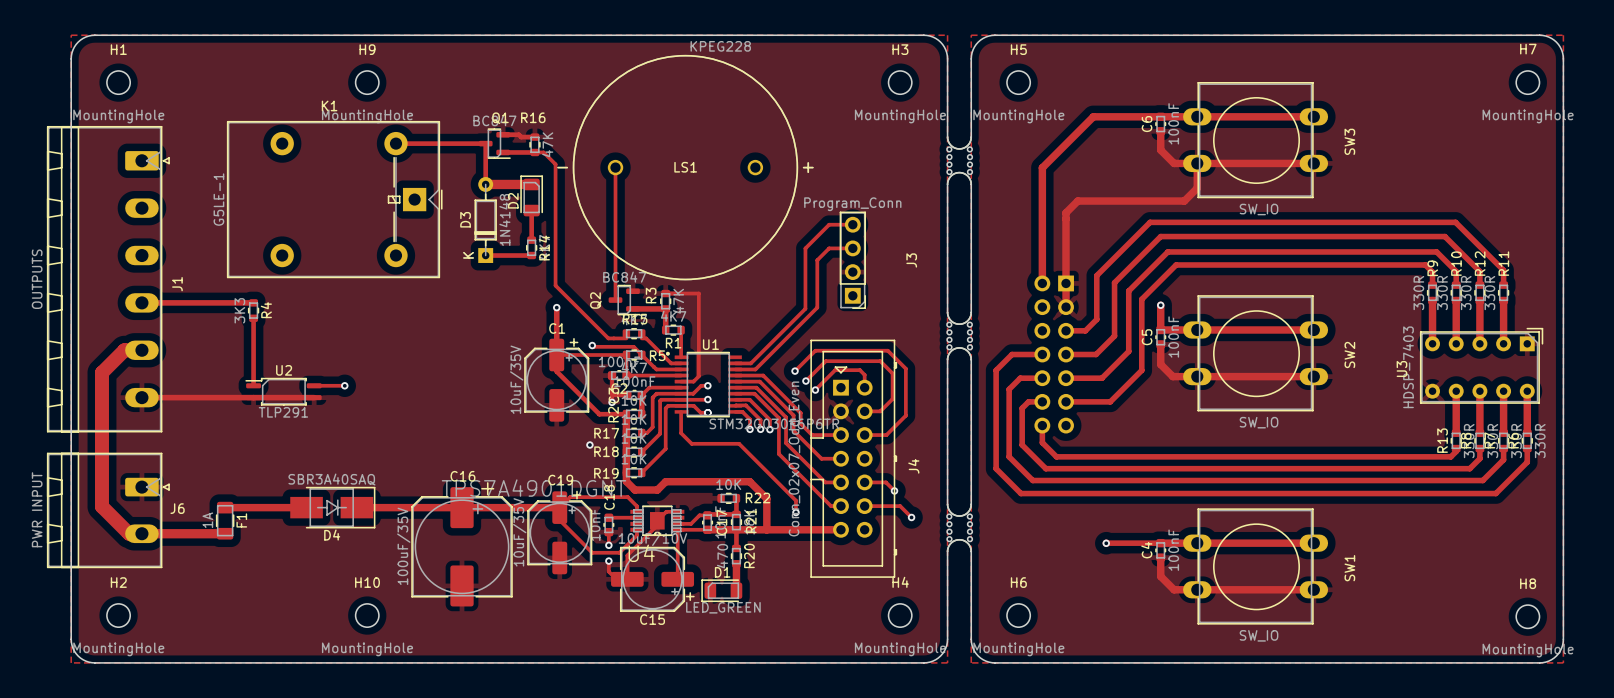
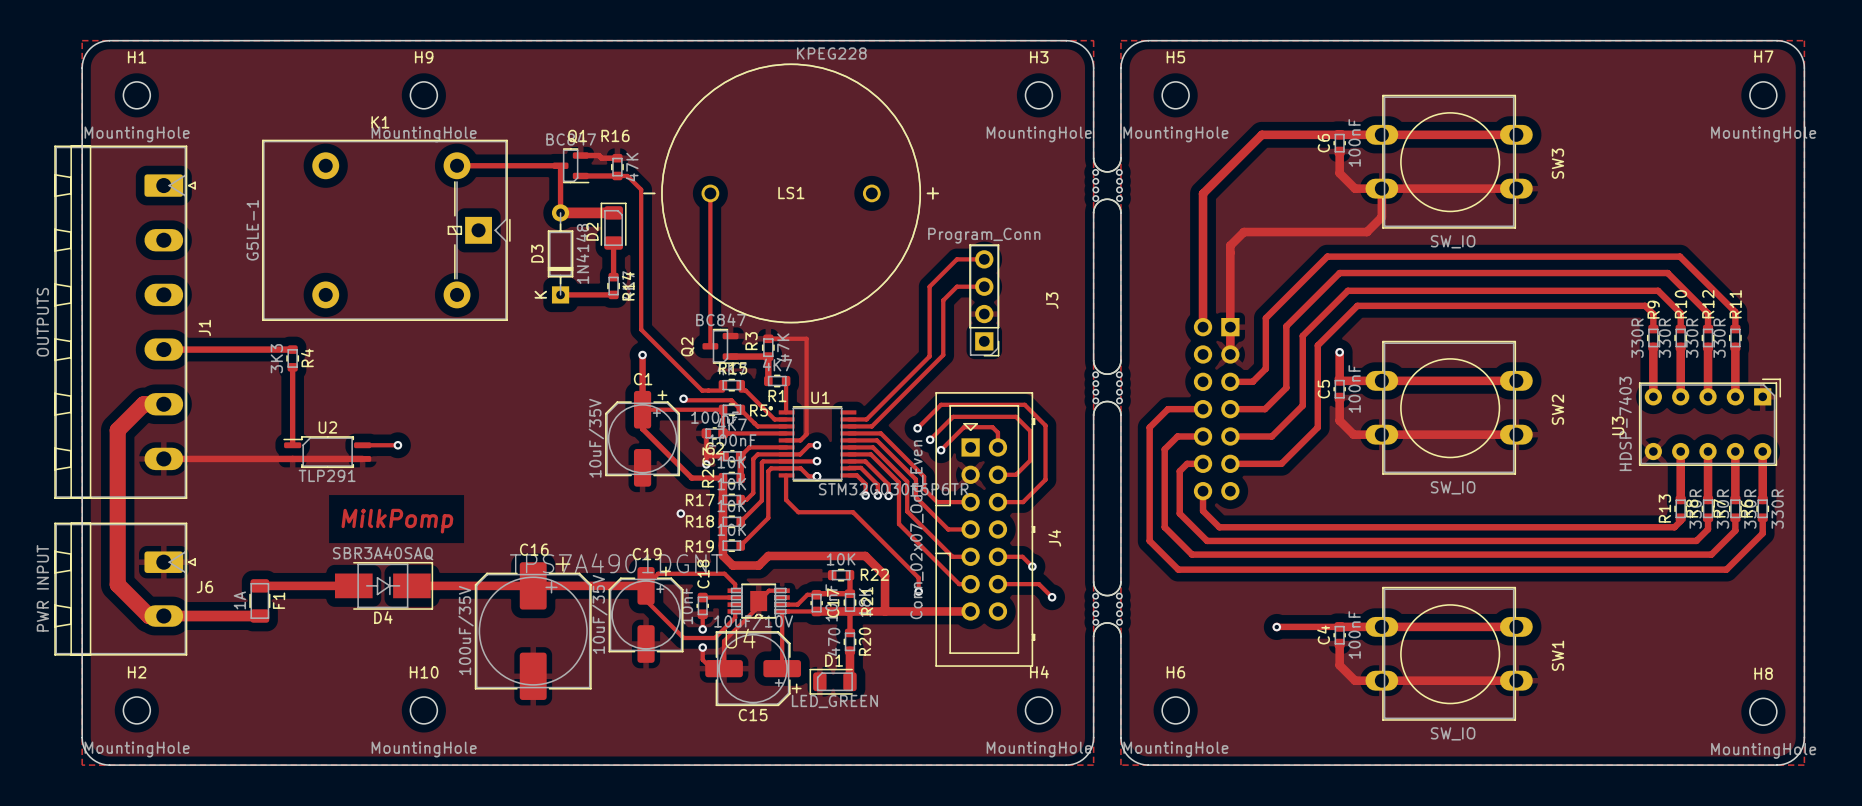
text: none -> MilkPomp (397, 521)

